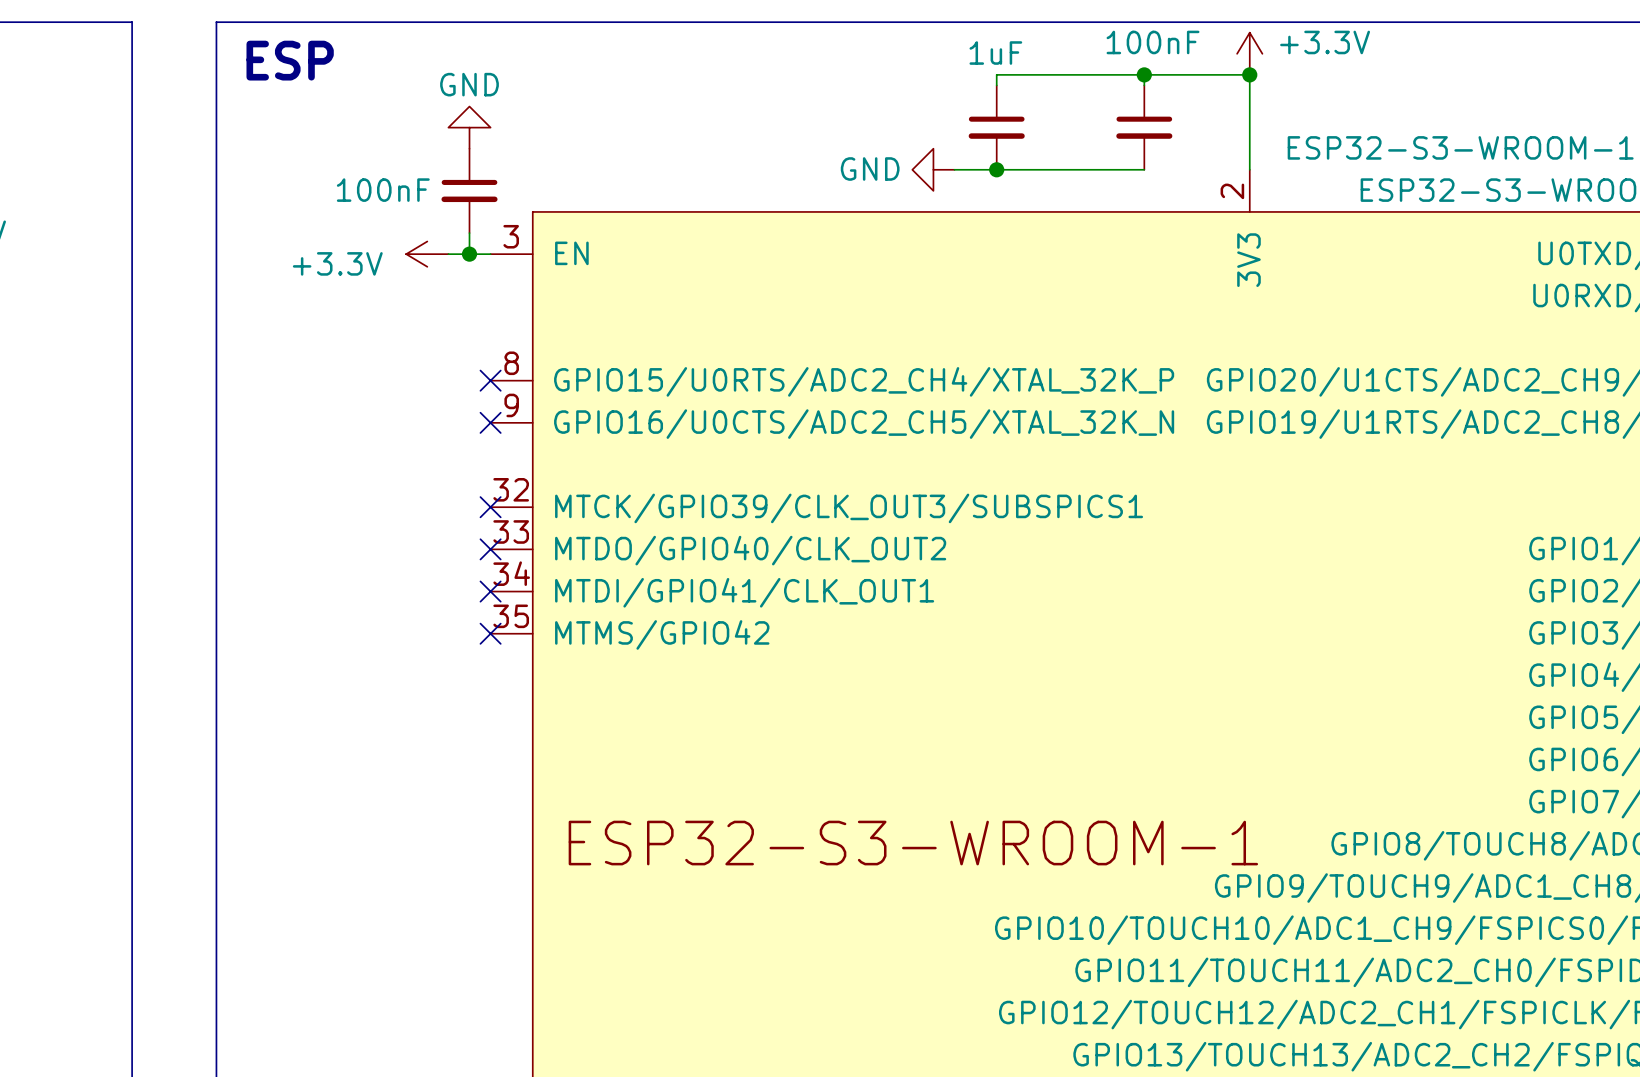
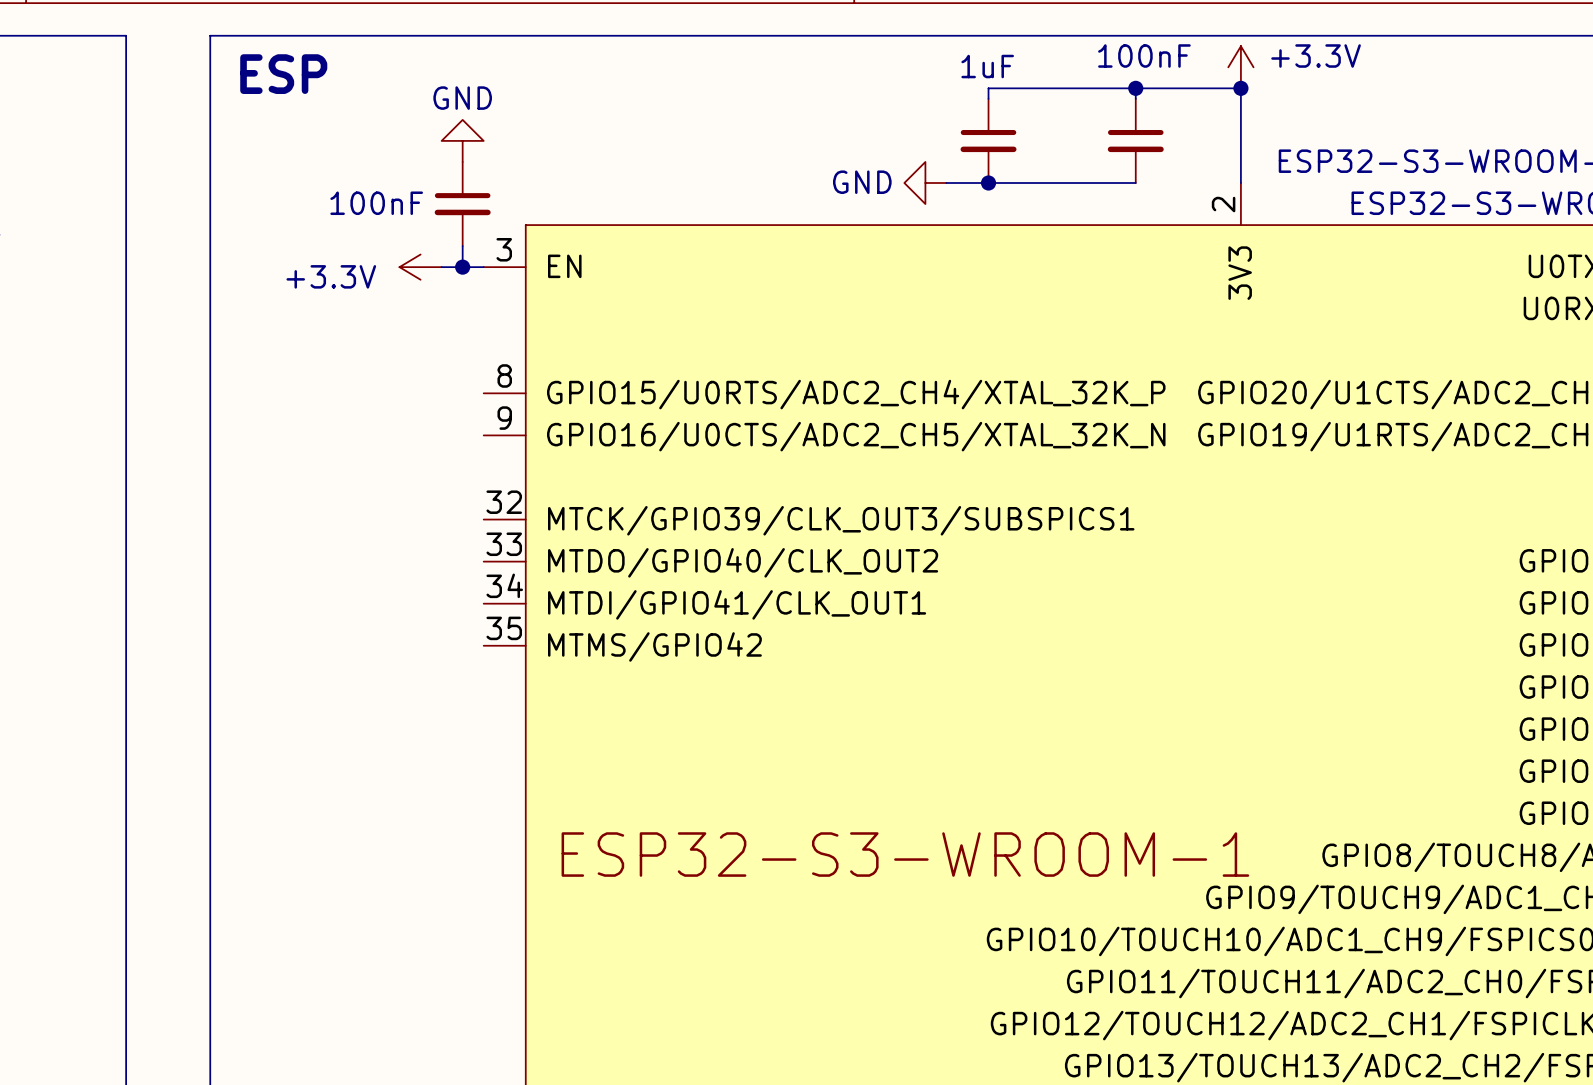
no-connect mark: (490, 380) -> none
no-connect mark: (490, 422) -> none
no-connect mark: (490, 507) -> none
no-connect mark: (490, 549) -> none
no-connect mark: (490, 591) -> none
no-connect mark: (490, 633) -> none

